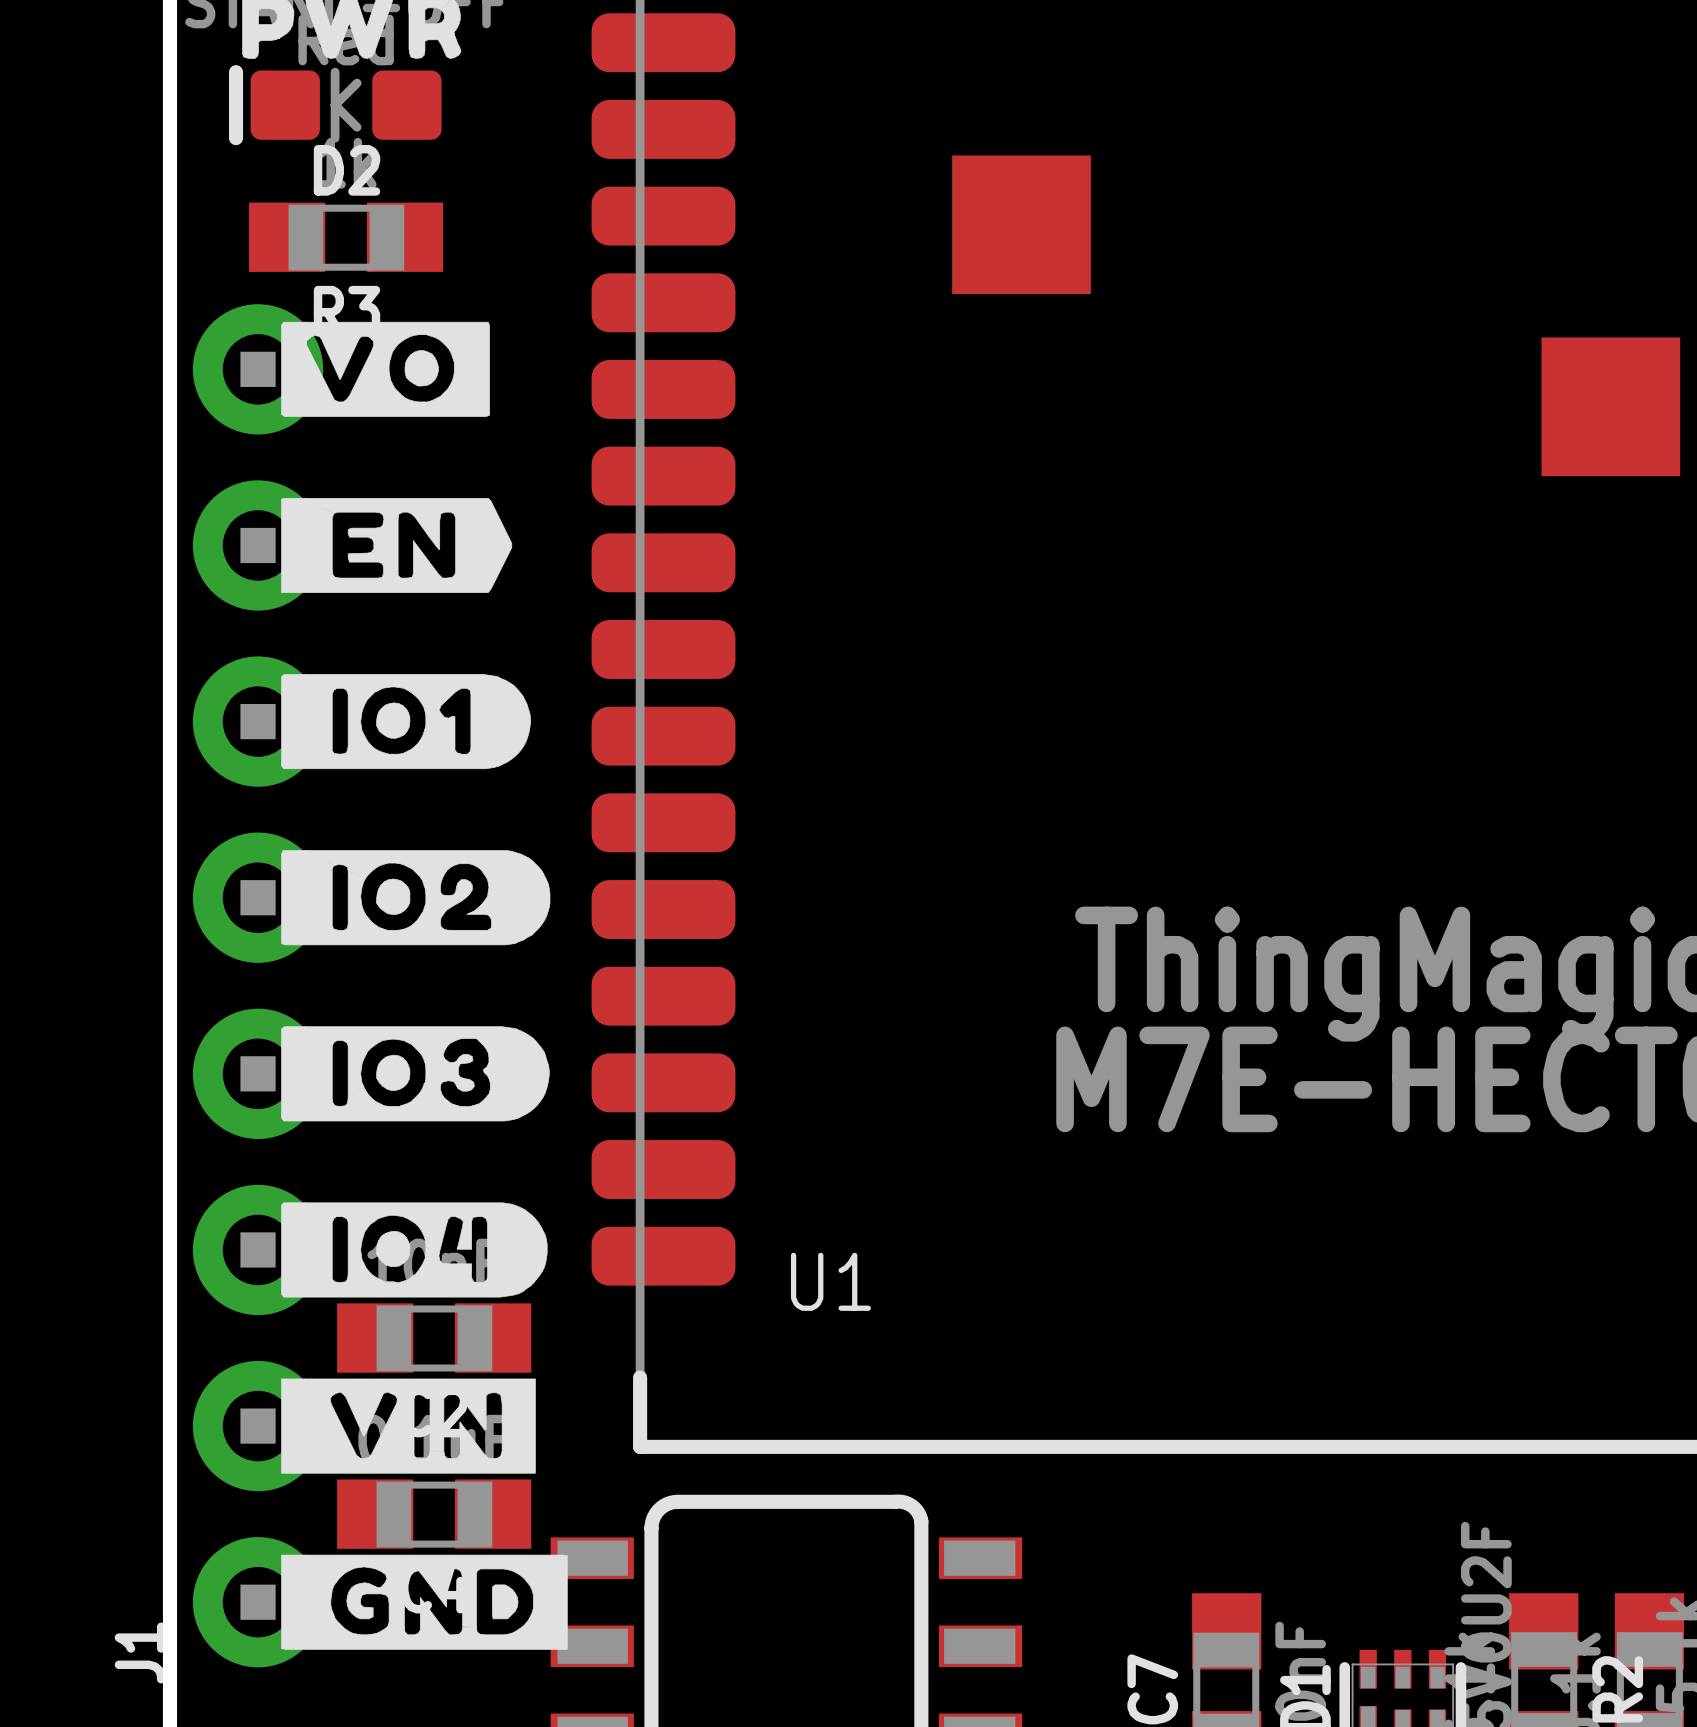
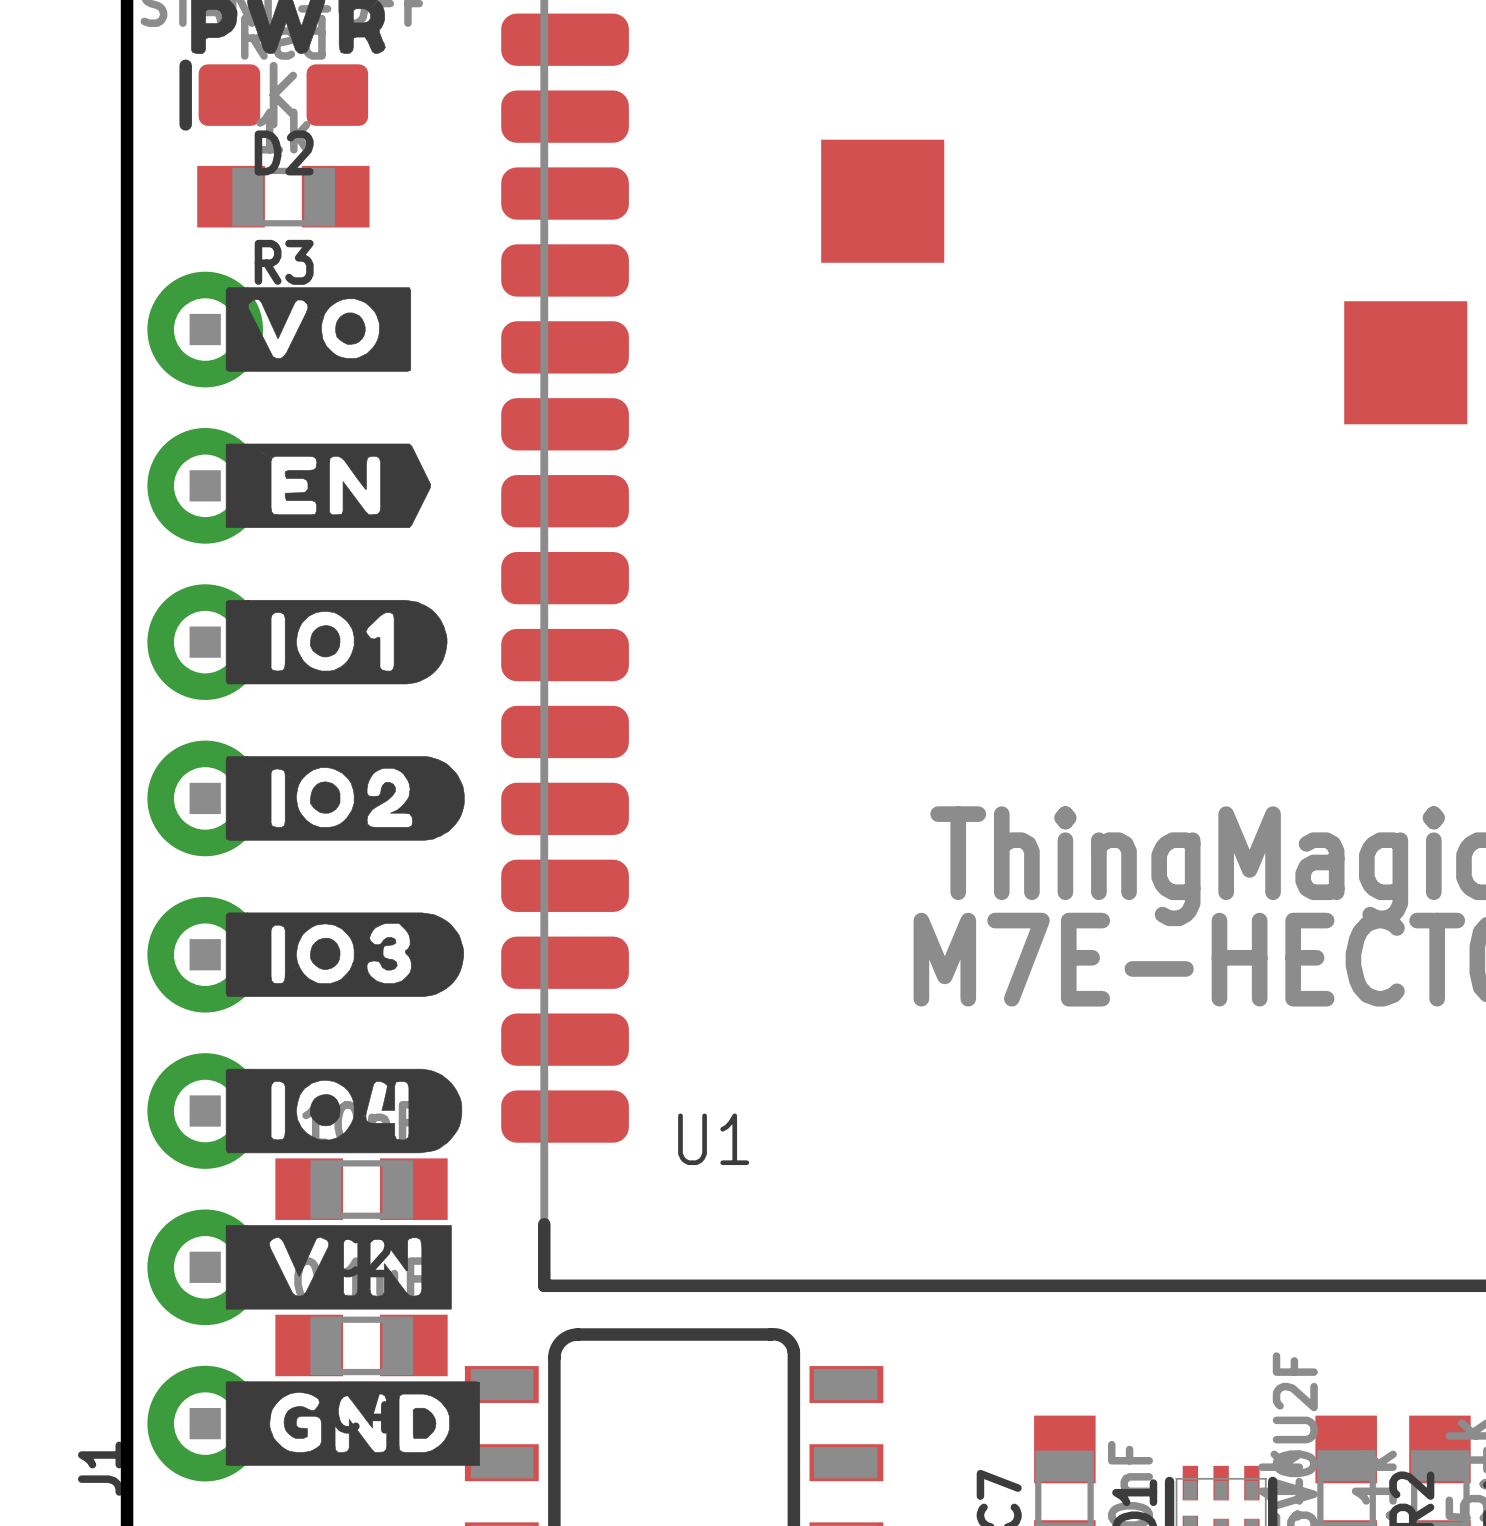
R3 position: (346, 237) -> (283, 196)

